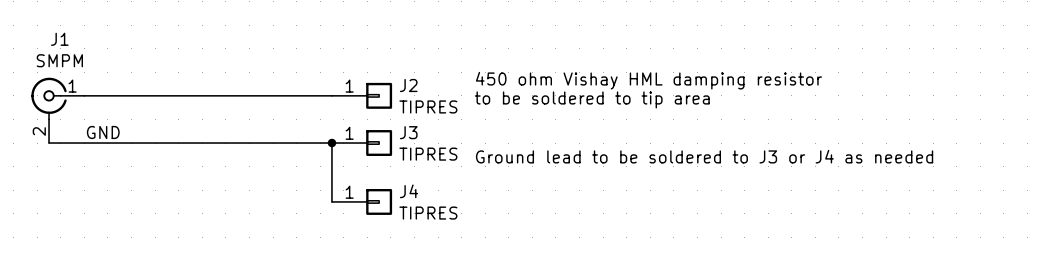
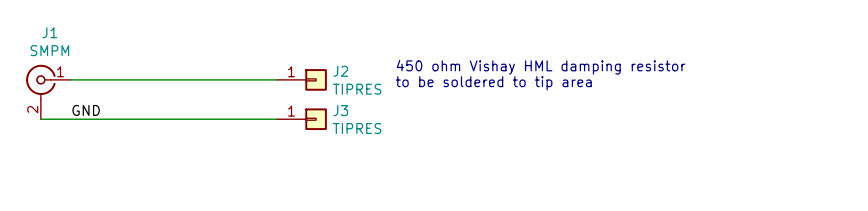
wire: (331, 143) (331, 201) -> none
junction: (331, 143) -> none
text: Ground lead to be soldered to J3 or J4 as needed (704, 156) -> none
J4: TIPRES (362, 201) -> none

